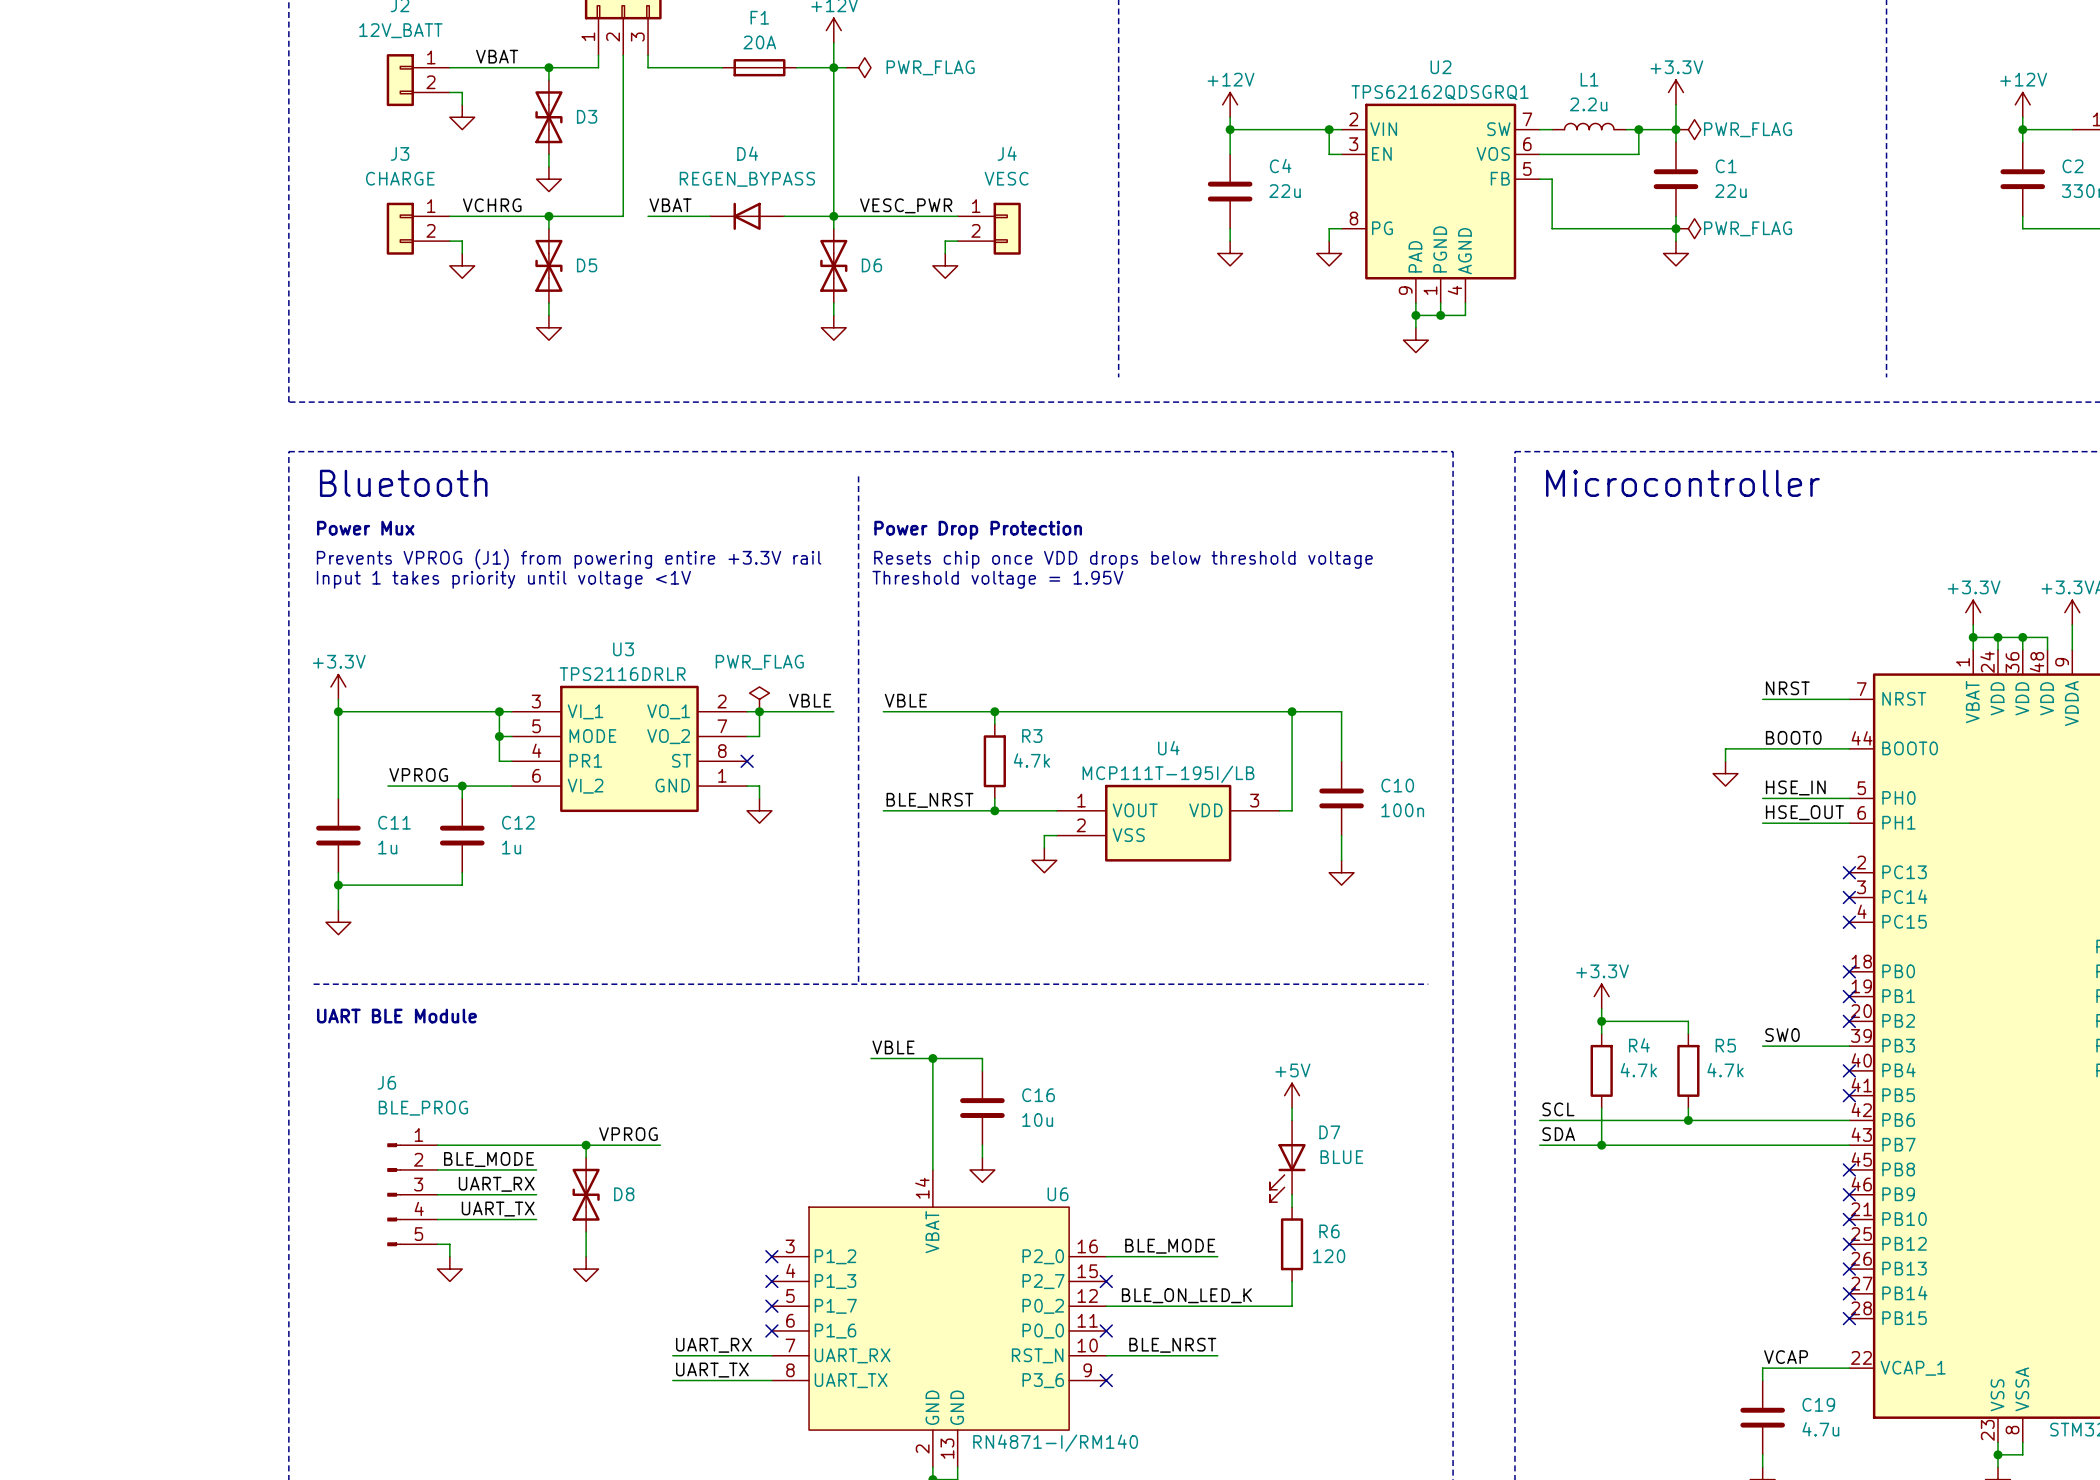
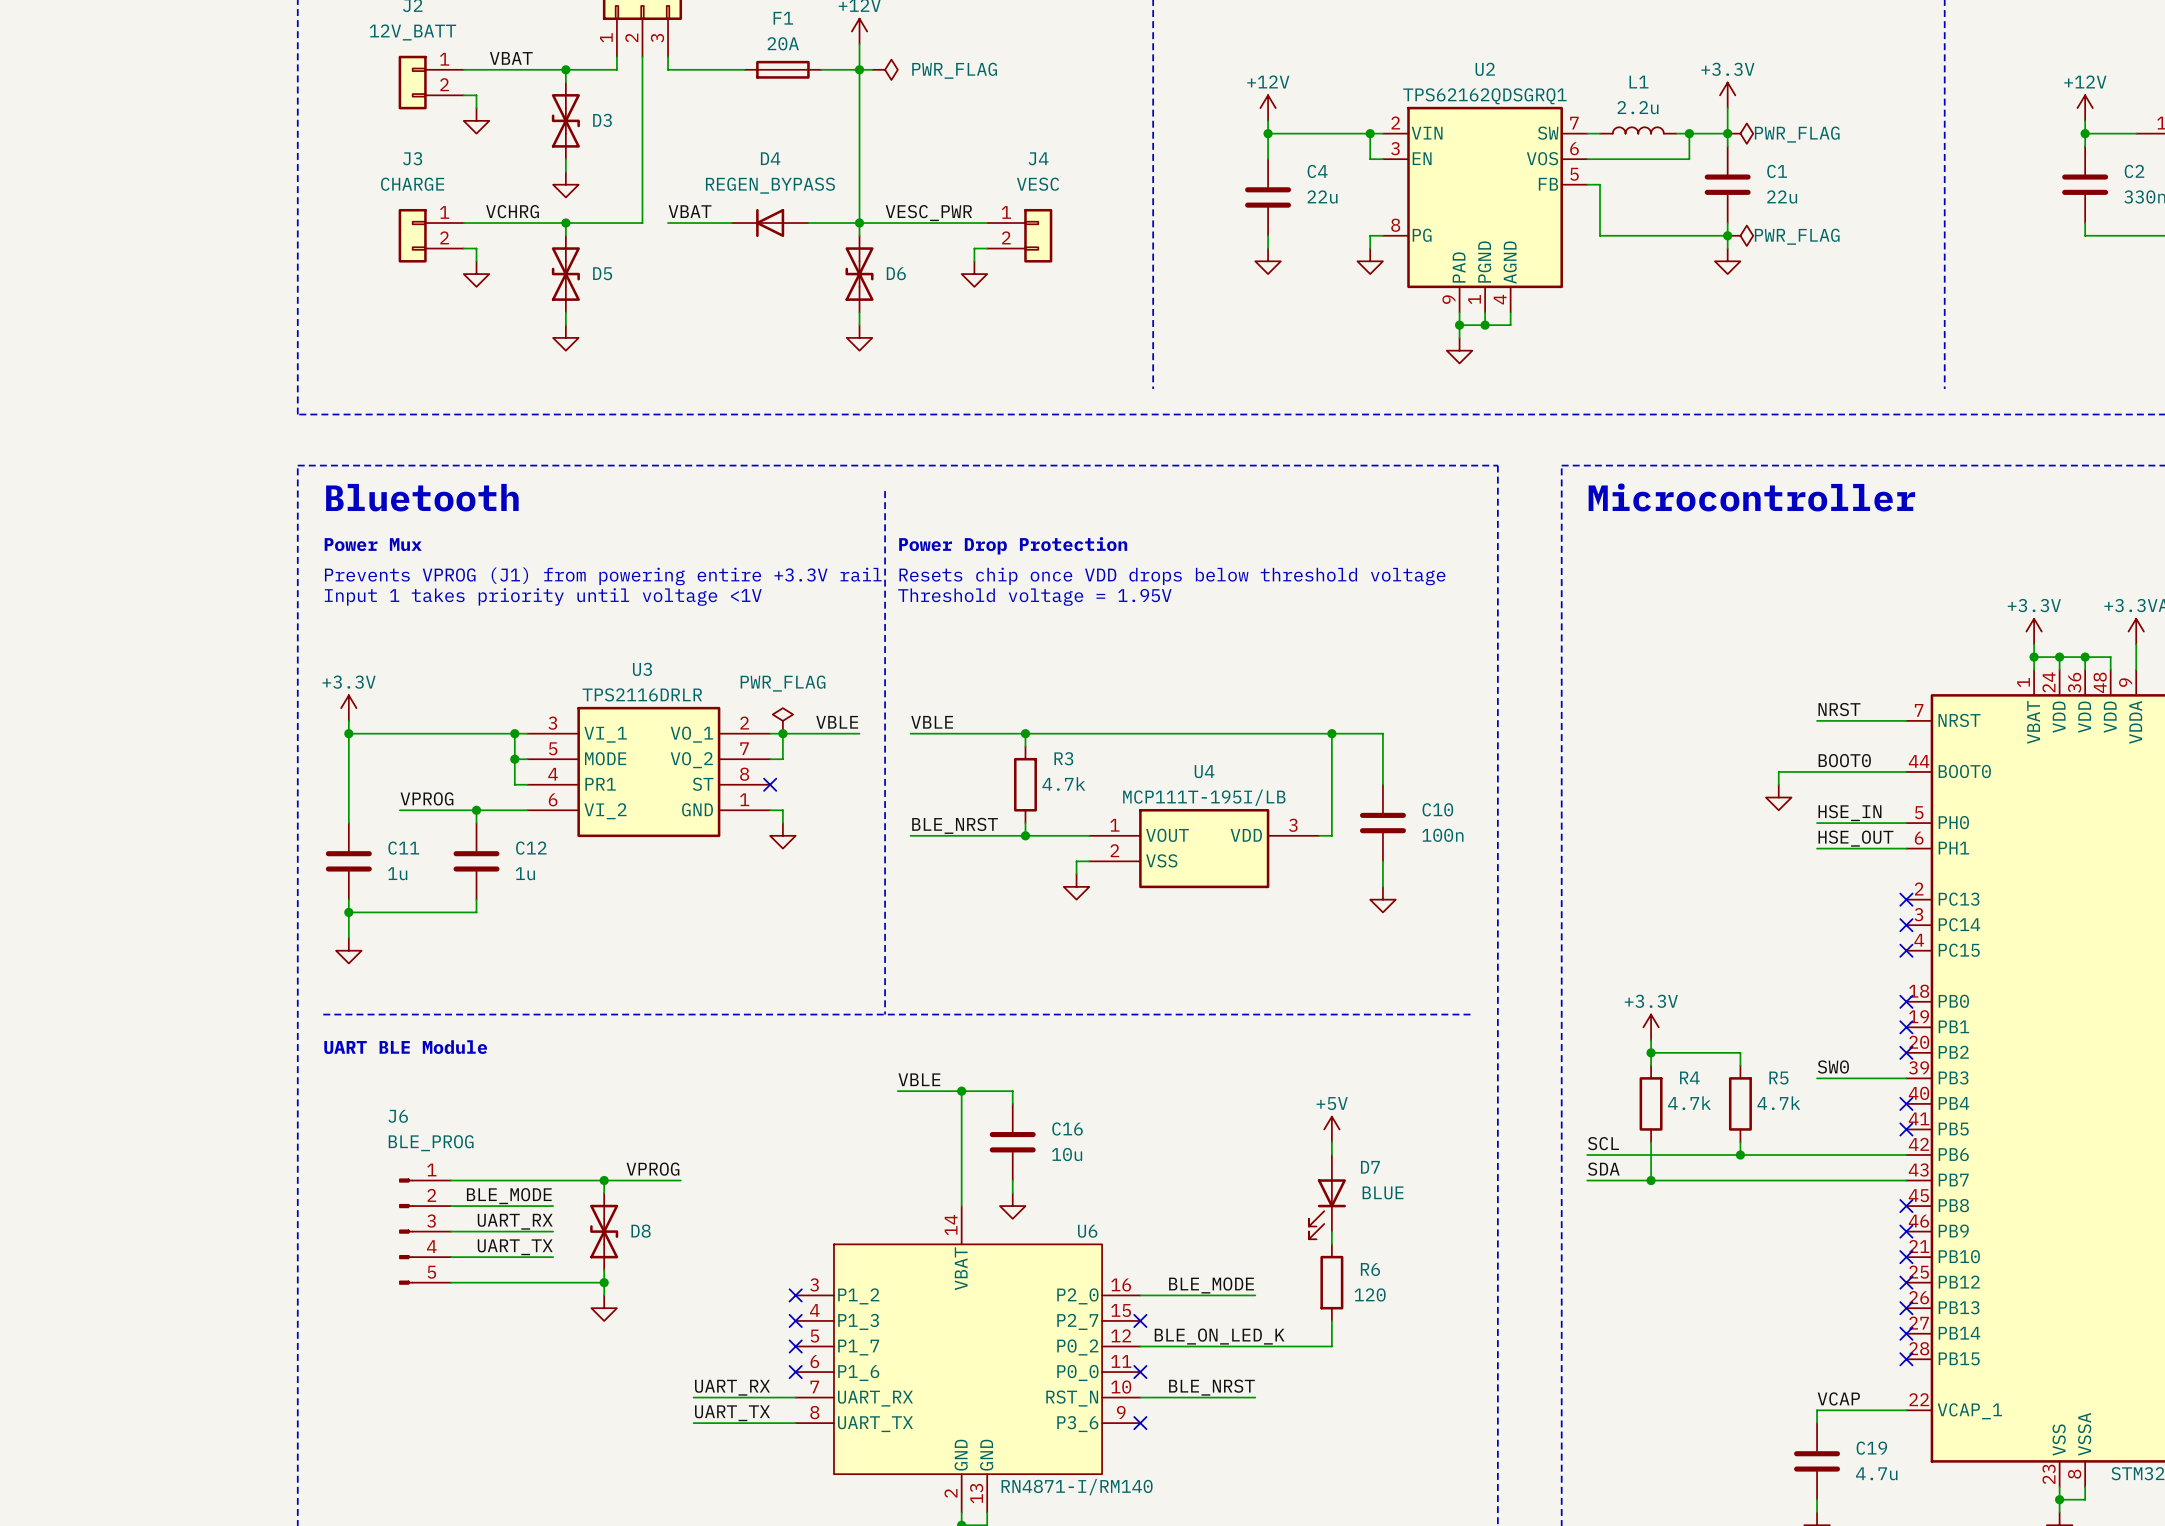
wire: (449, 1244) (449, 1256) -> (463, 1282) (604, 1282)
junction: none -> (604, 1282)
power symbol: (449, 1269) -> none

